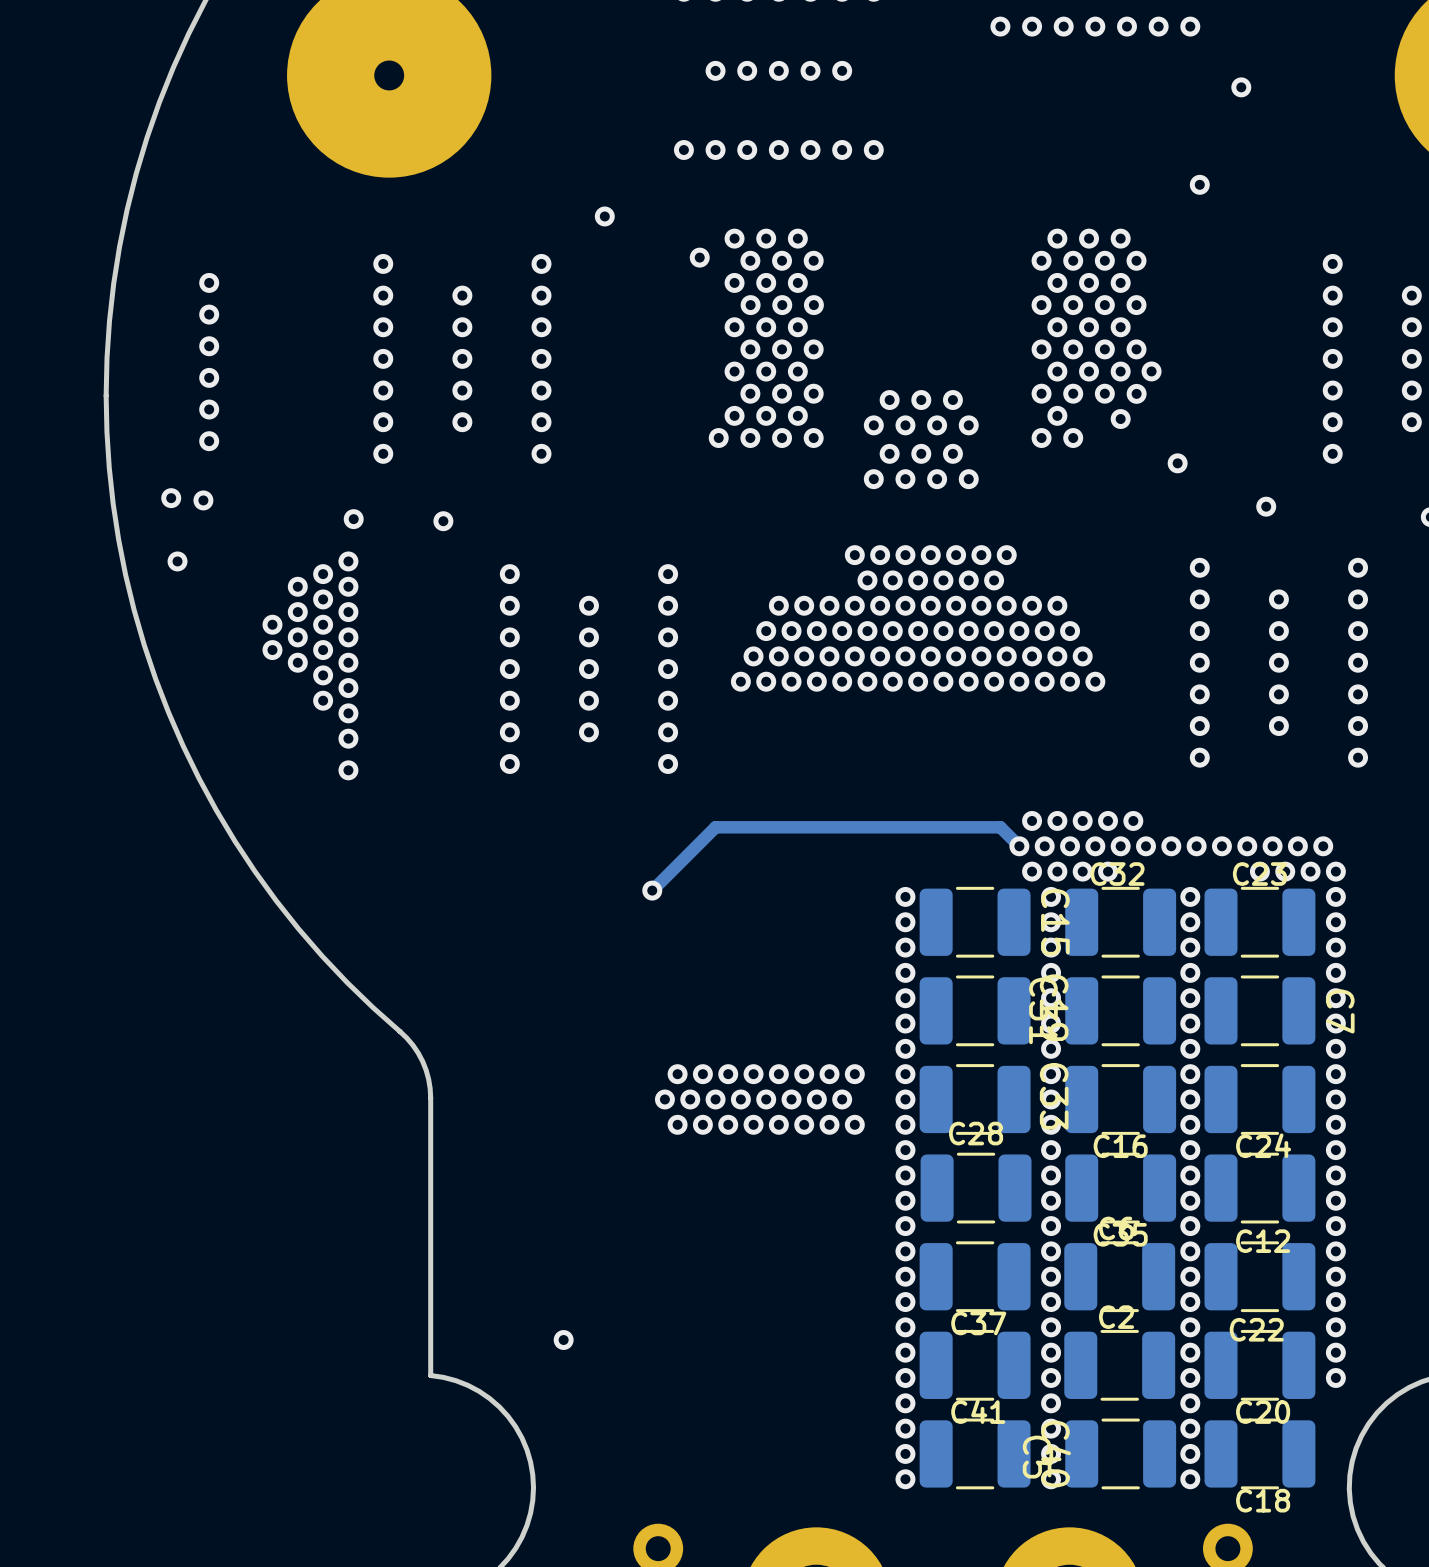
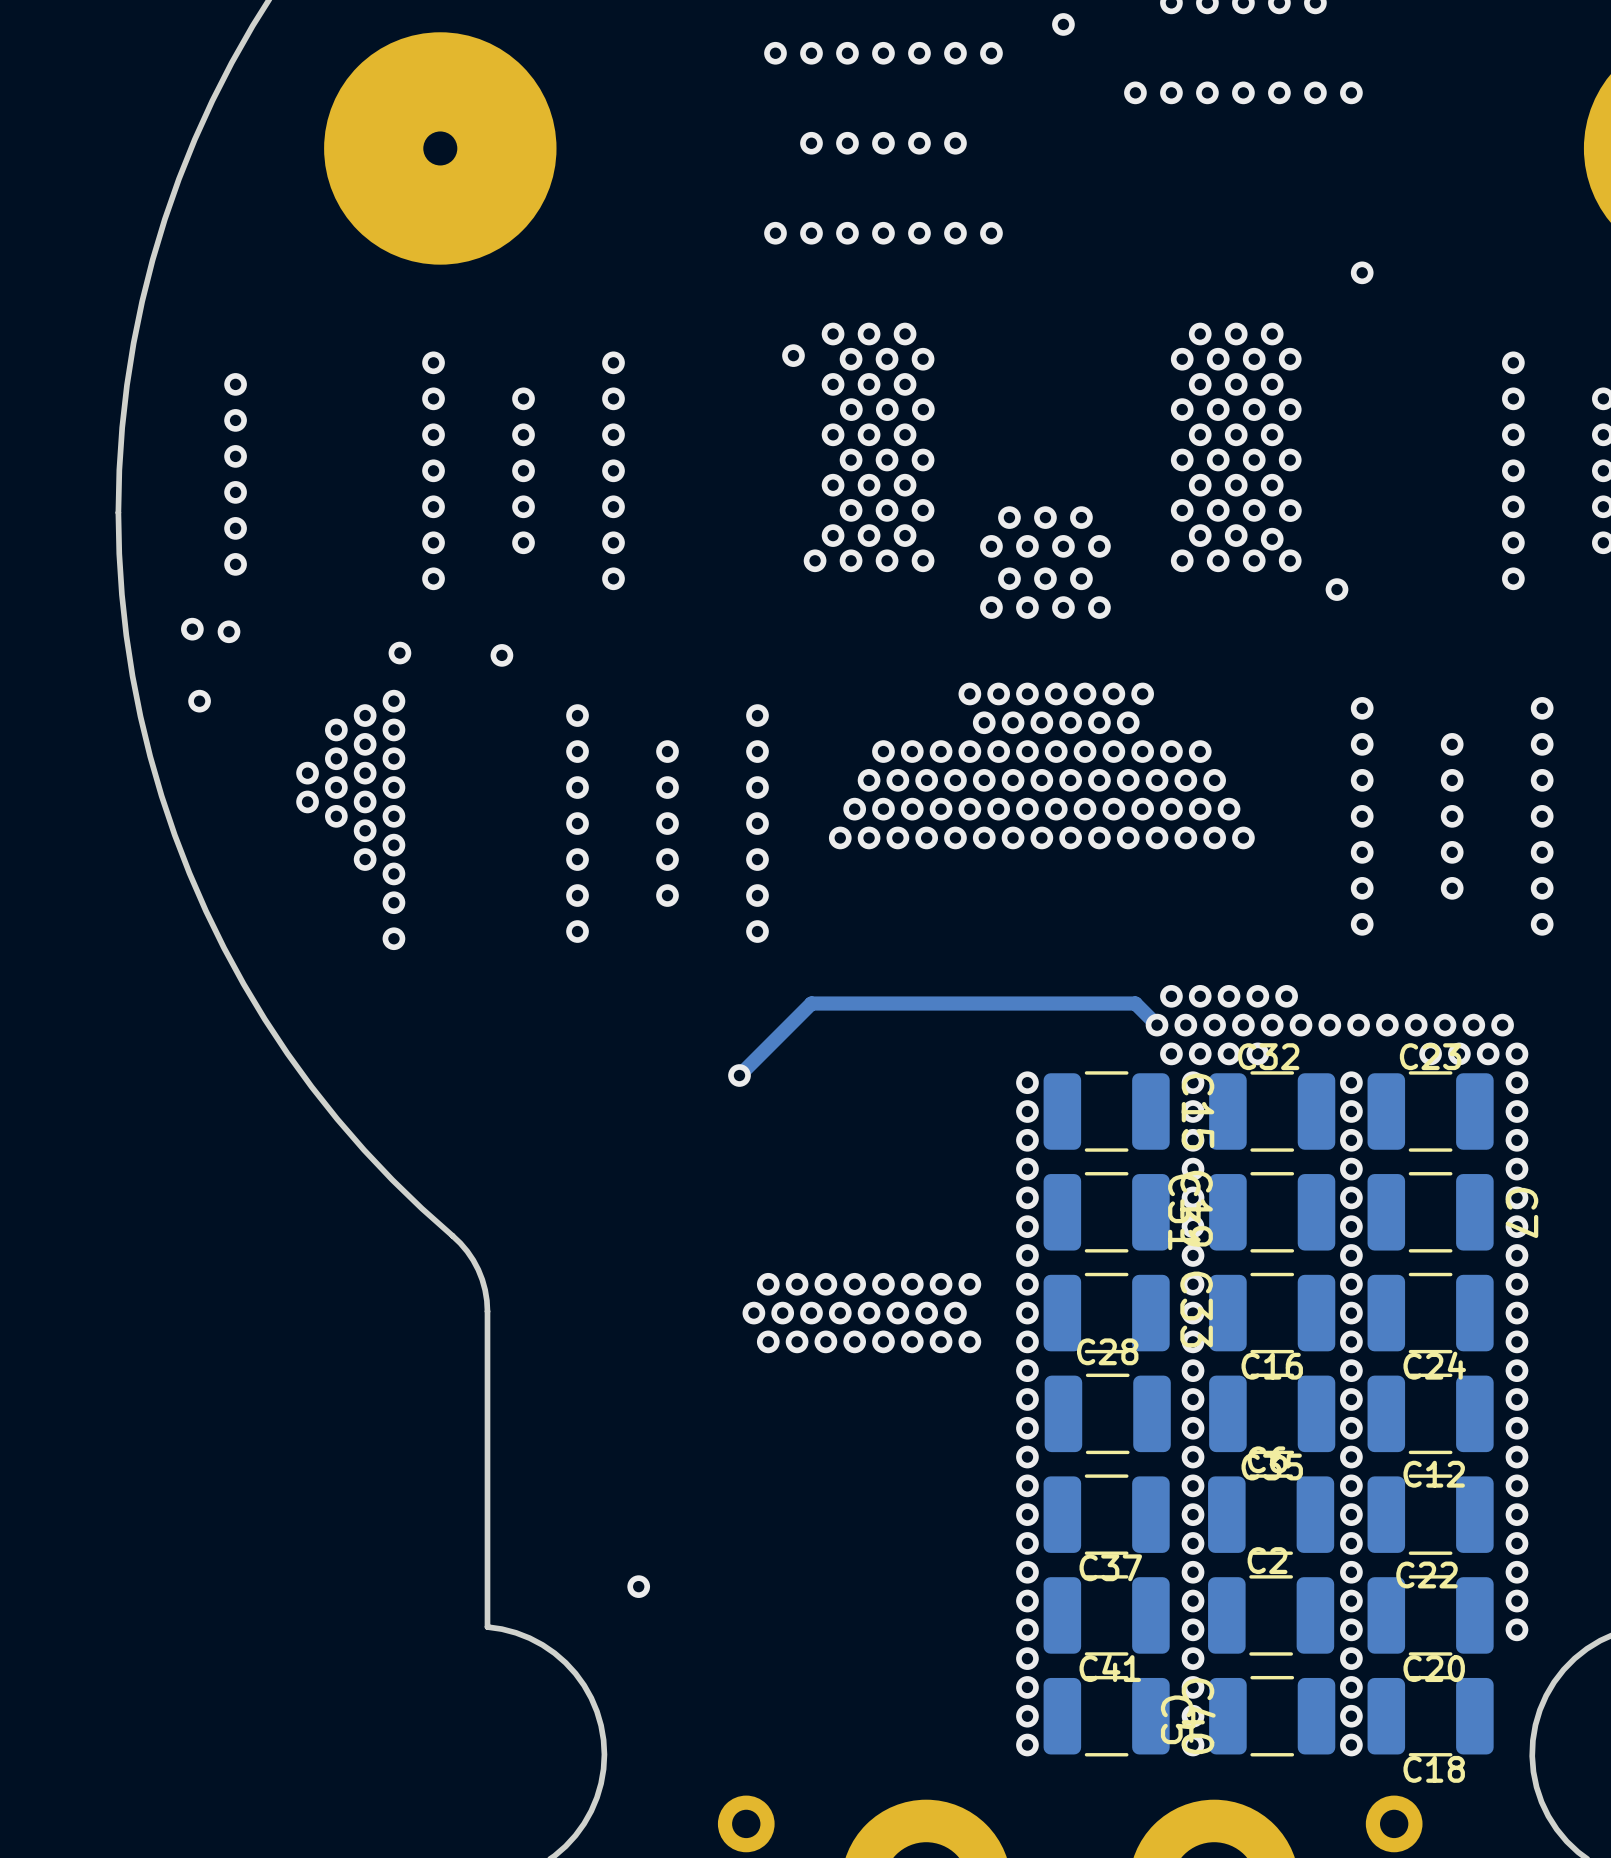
via: (1241, 87) -> none
via: (604, 216) -> none
via: (1151, 371) -> none
via: none -> (1236, 535)
via: none -> (1254, 560)
via: none -> (1290, 560)
via: (1266, 506) -> none

